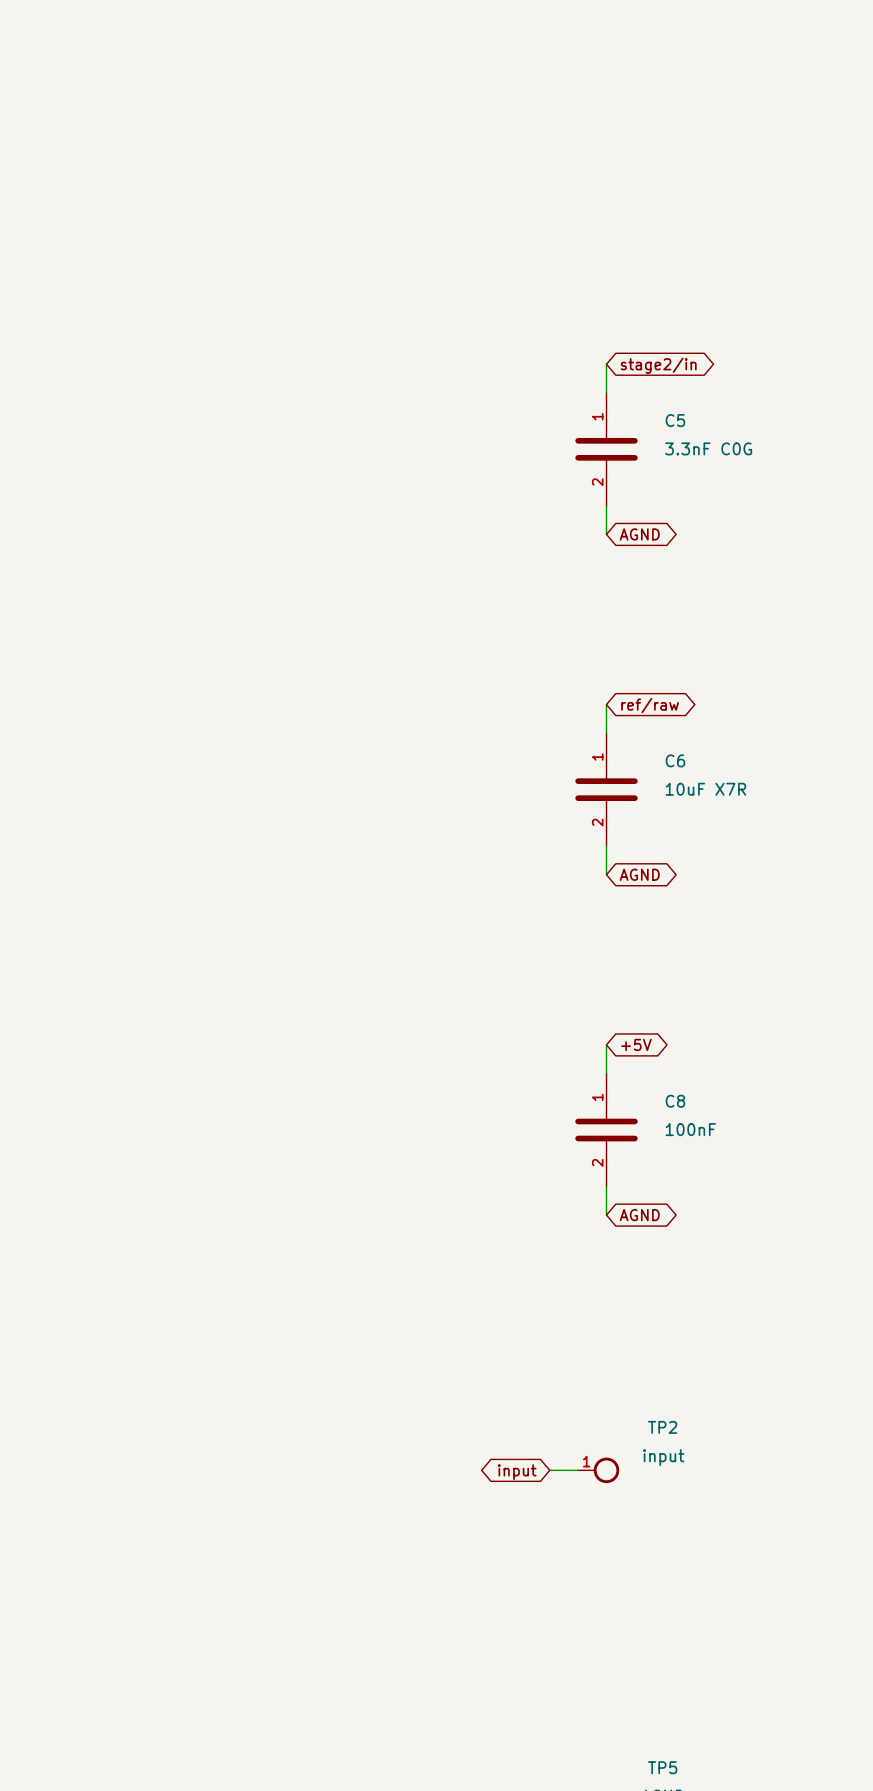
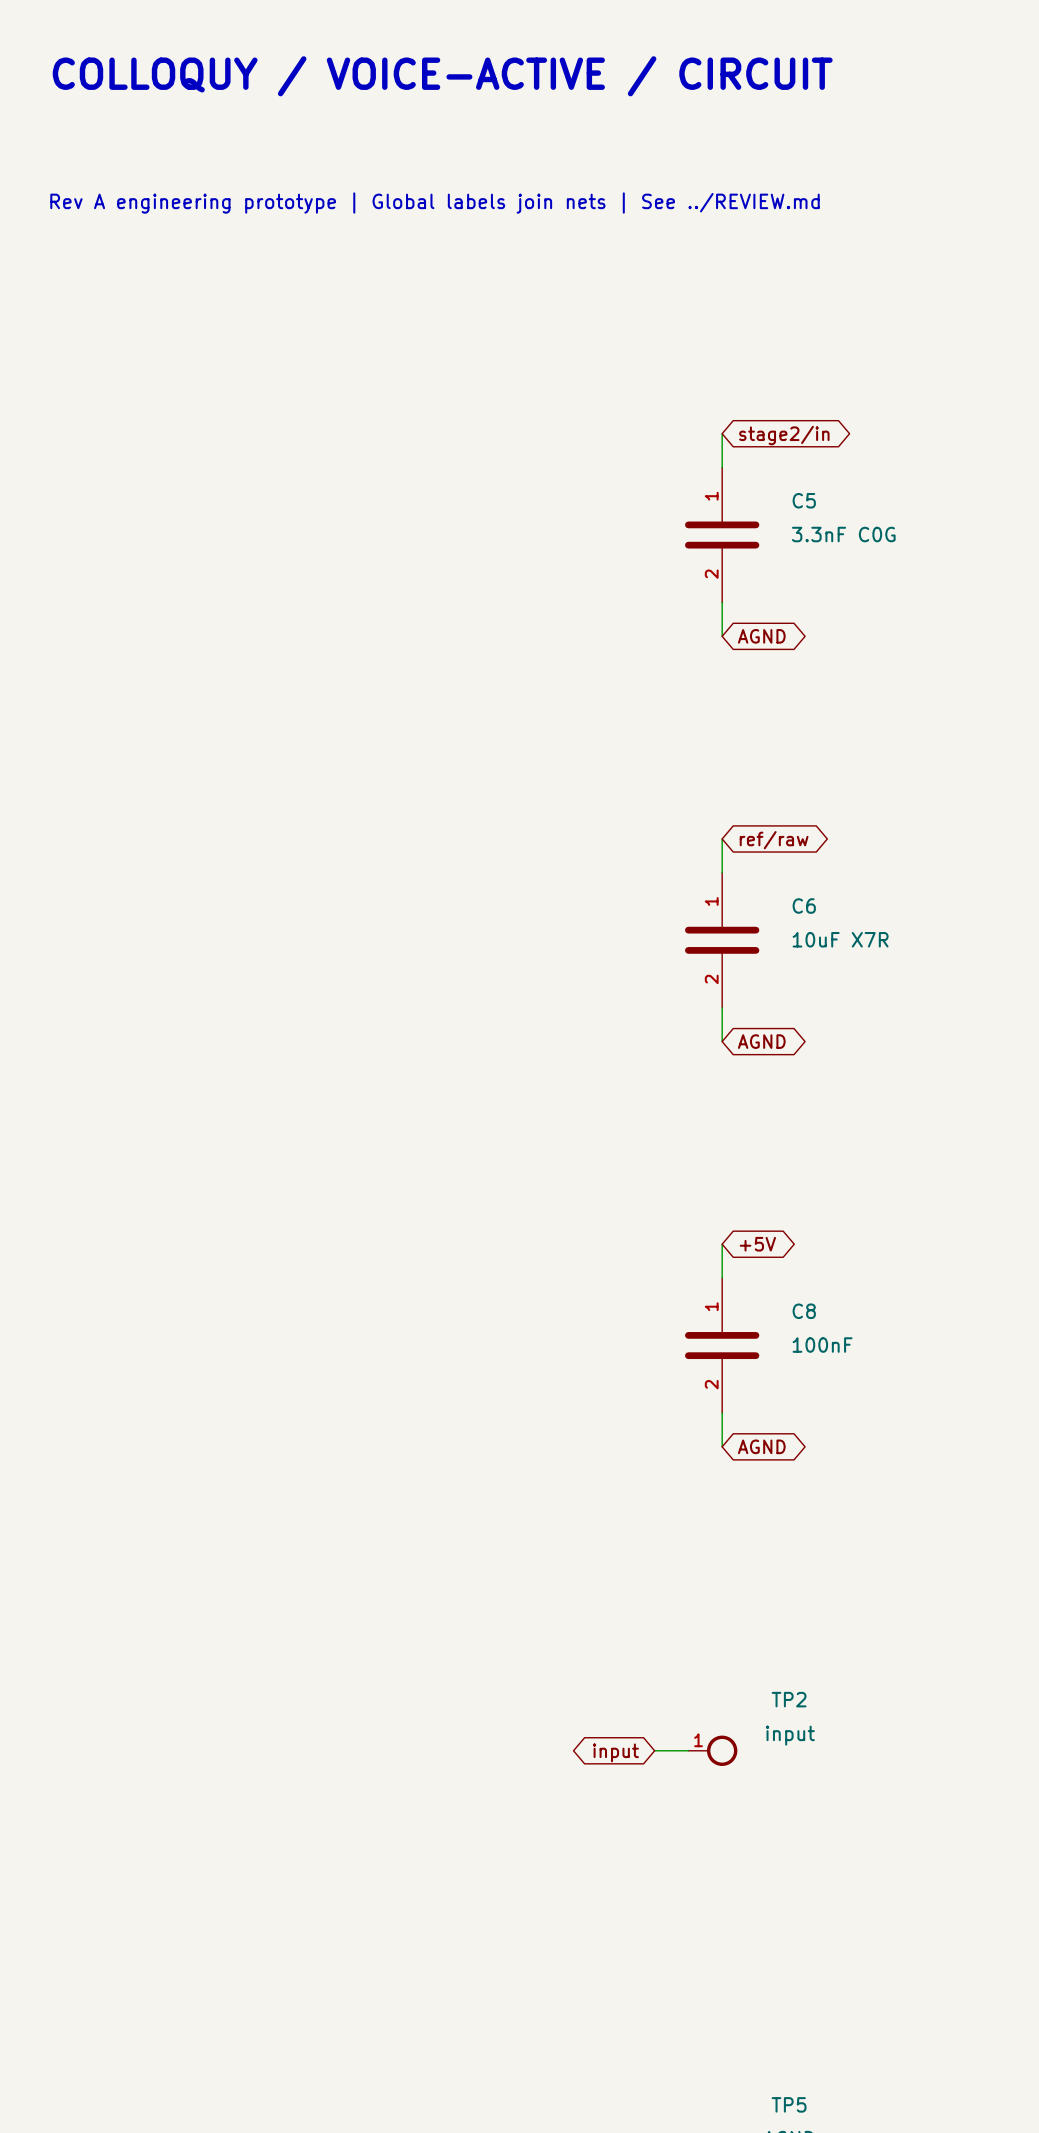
text: none -> COLLOQUY / VOICE-ACTIVE / CIRCUIT (442, 76)
text: none -> Rev A engineering prototype | Global labels join nets | See ../REVIEW.md (435, 203)

